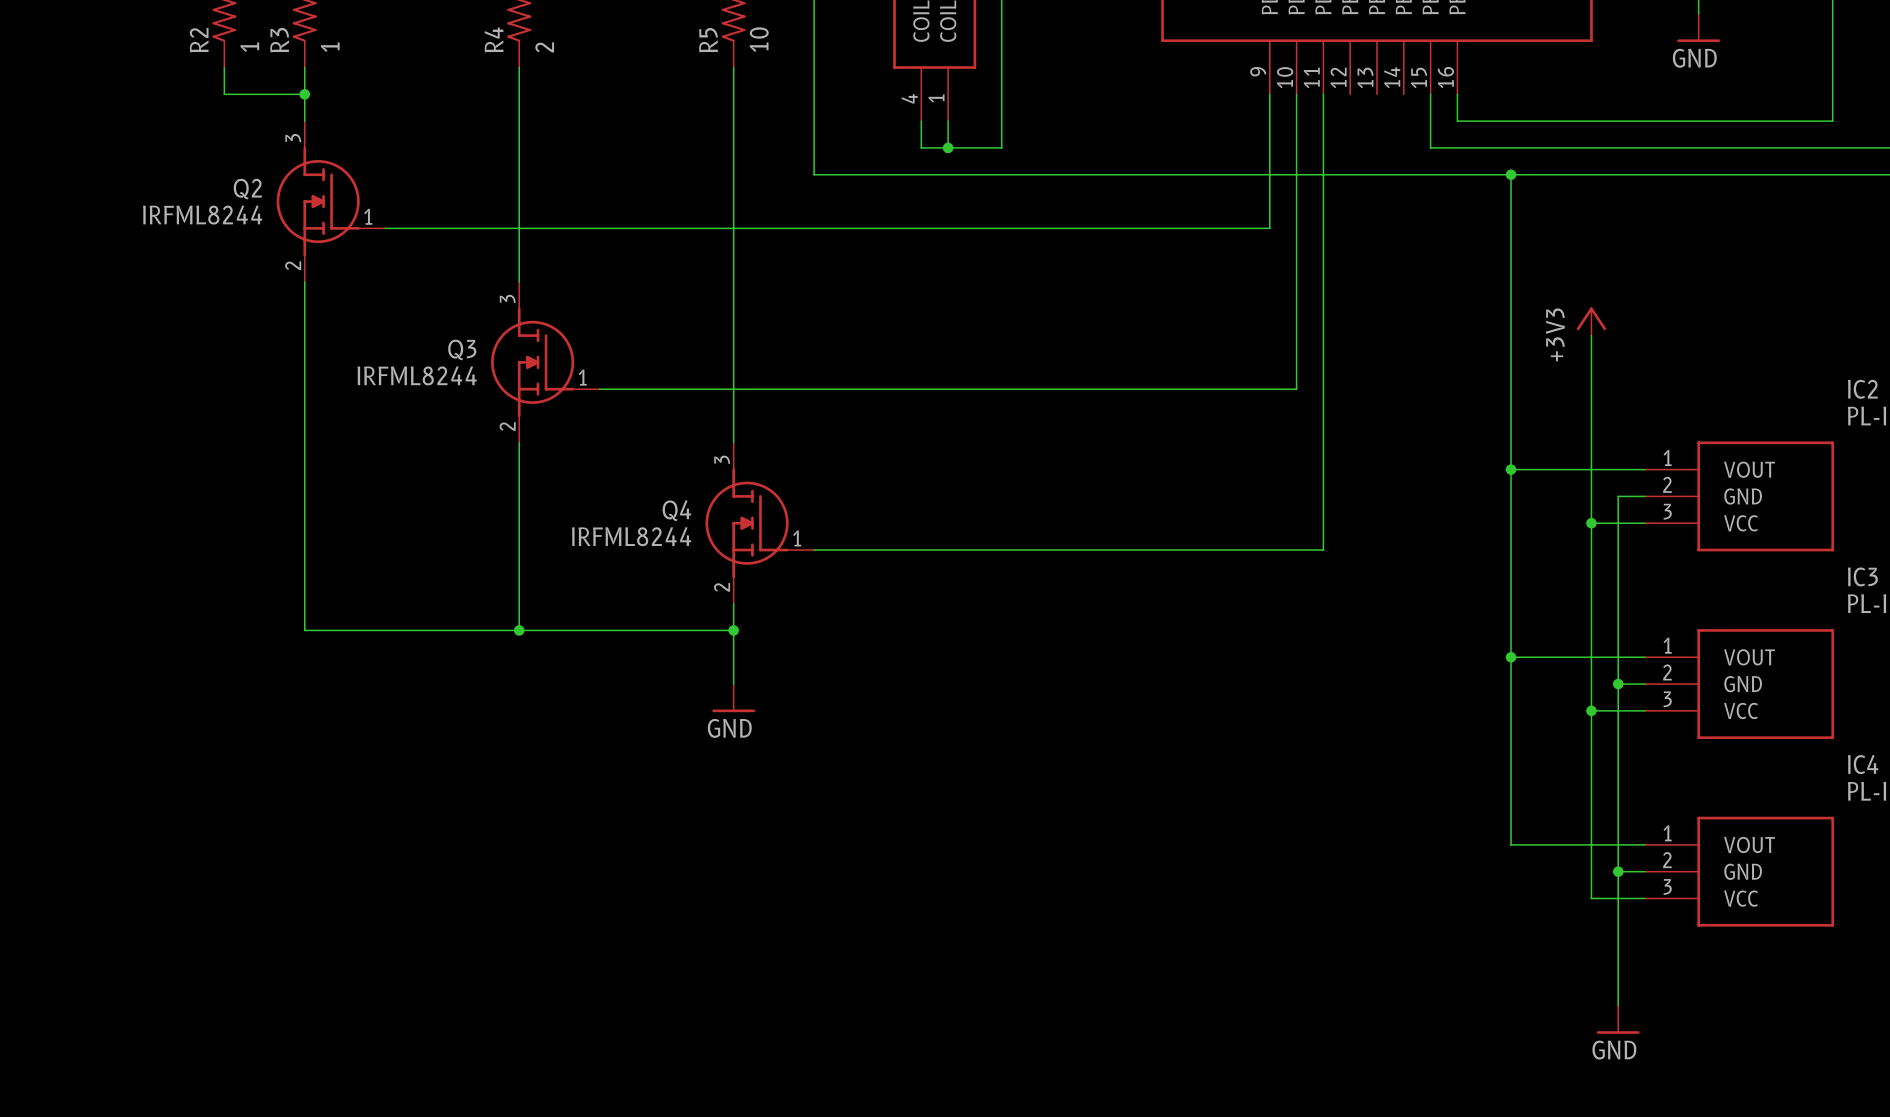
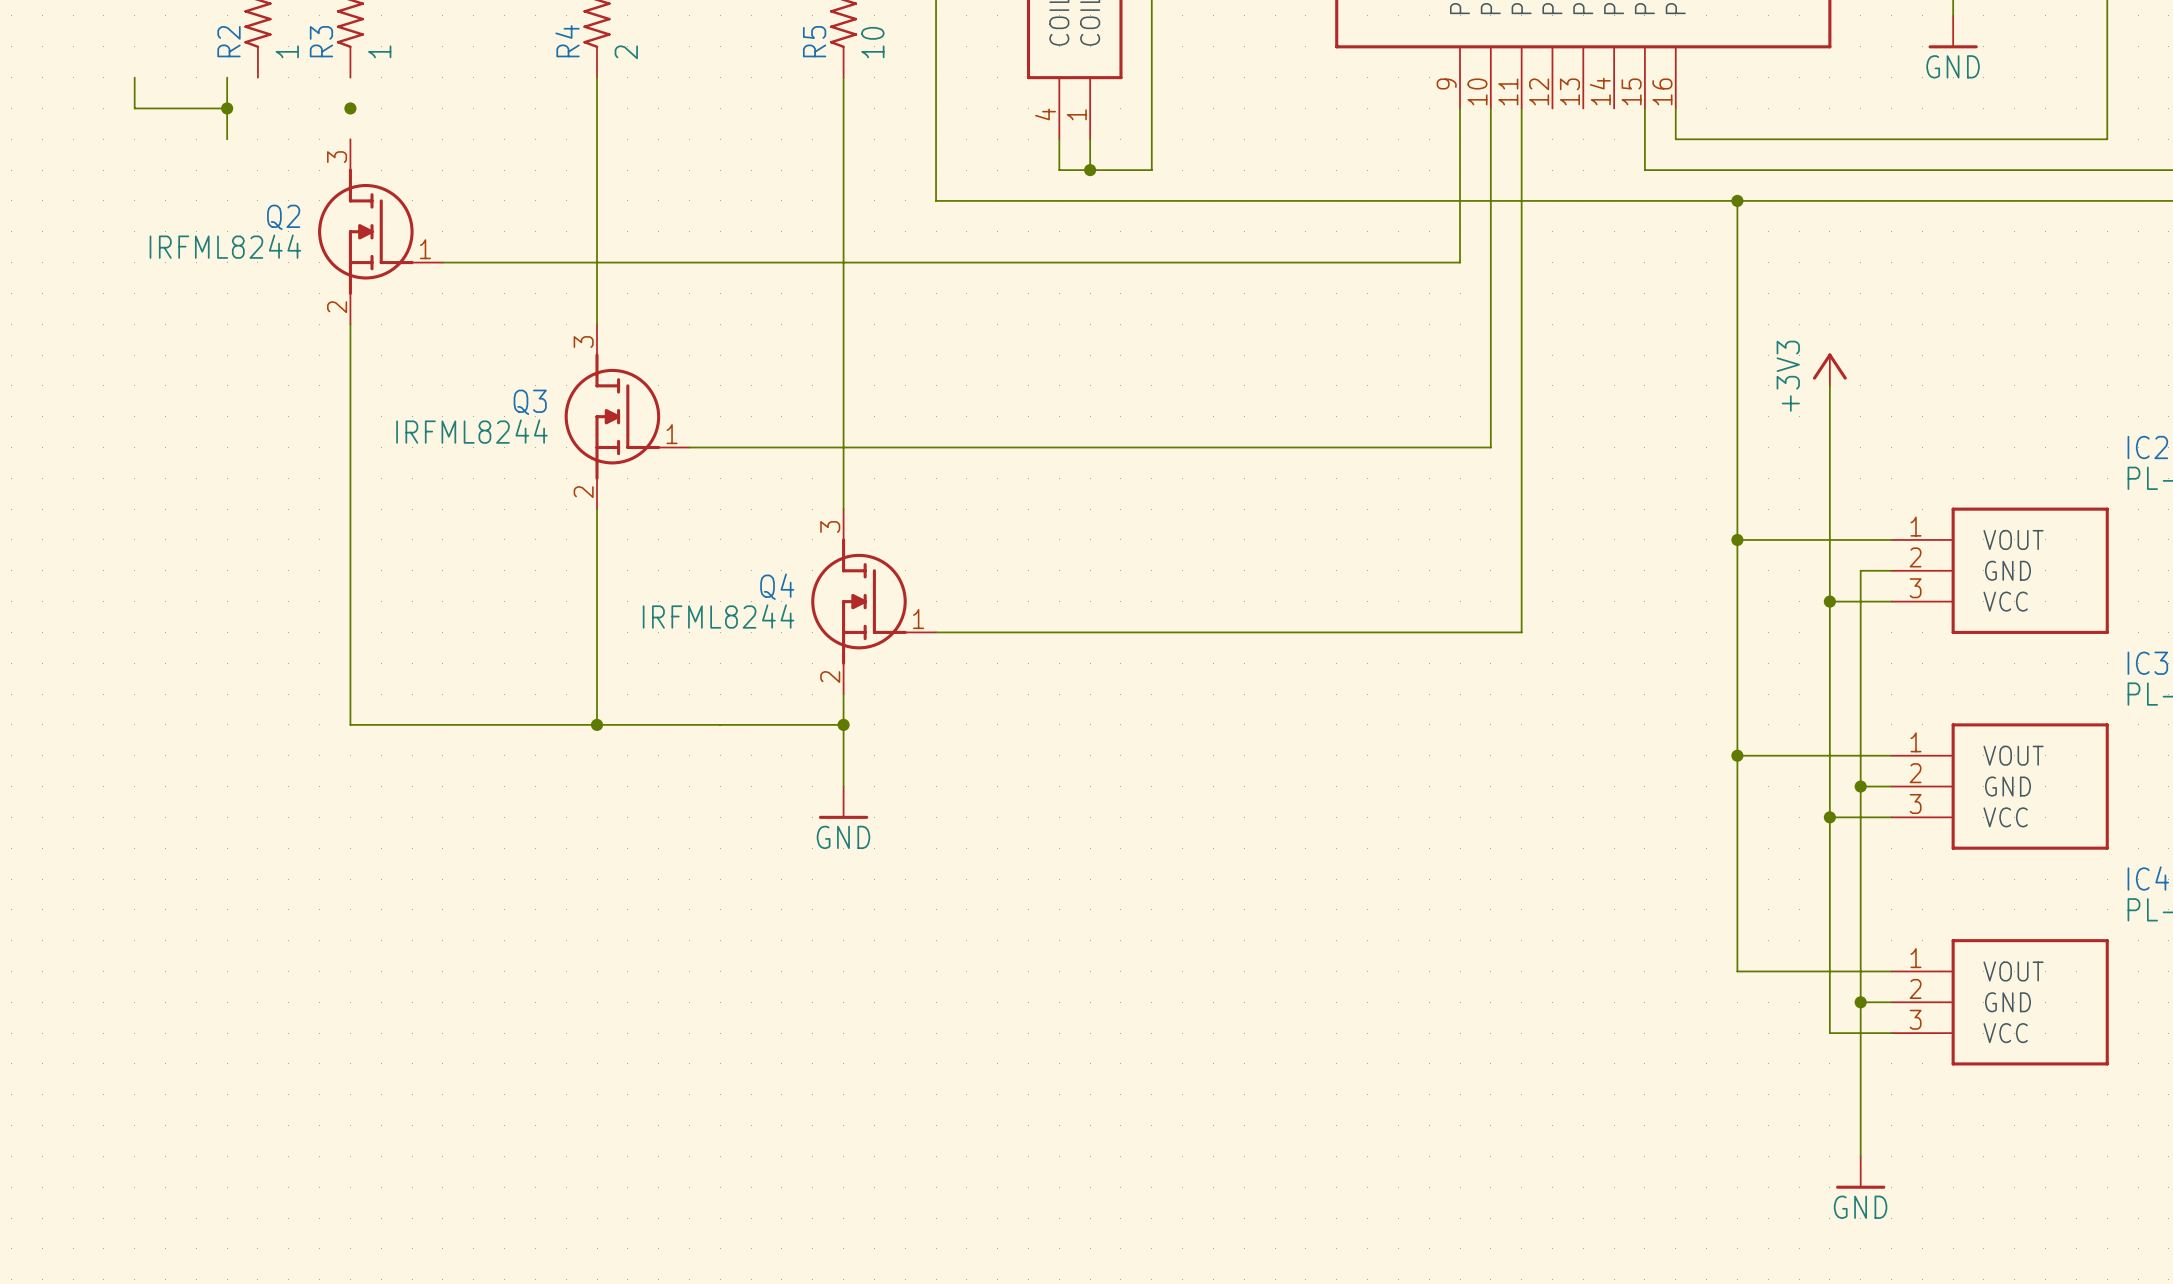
wire: (224, 67) (224, 94) (304, 94) -> (134, 77) (134, 108) (227, 108)
wire: (304, 67) (304, 121) -> (227, 77) (227, 139)
junction: none -> (227, 108)

